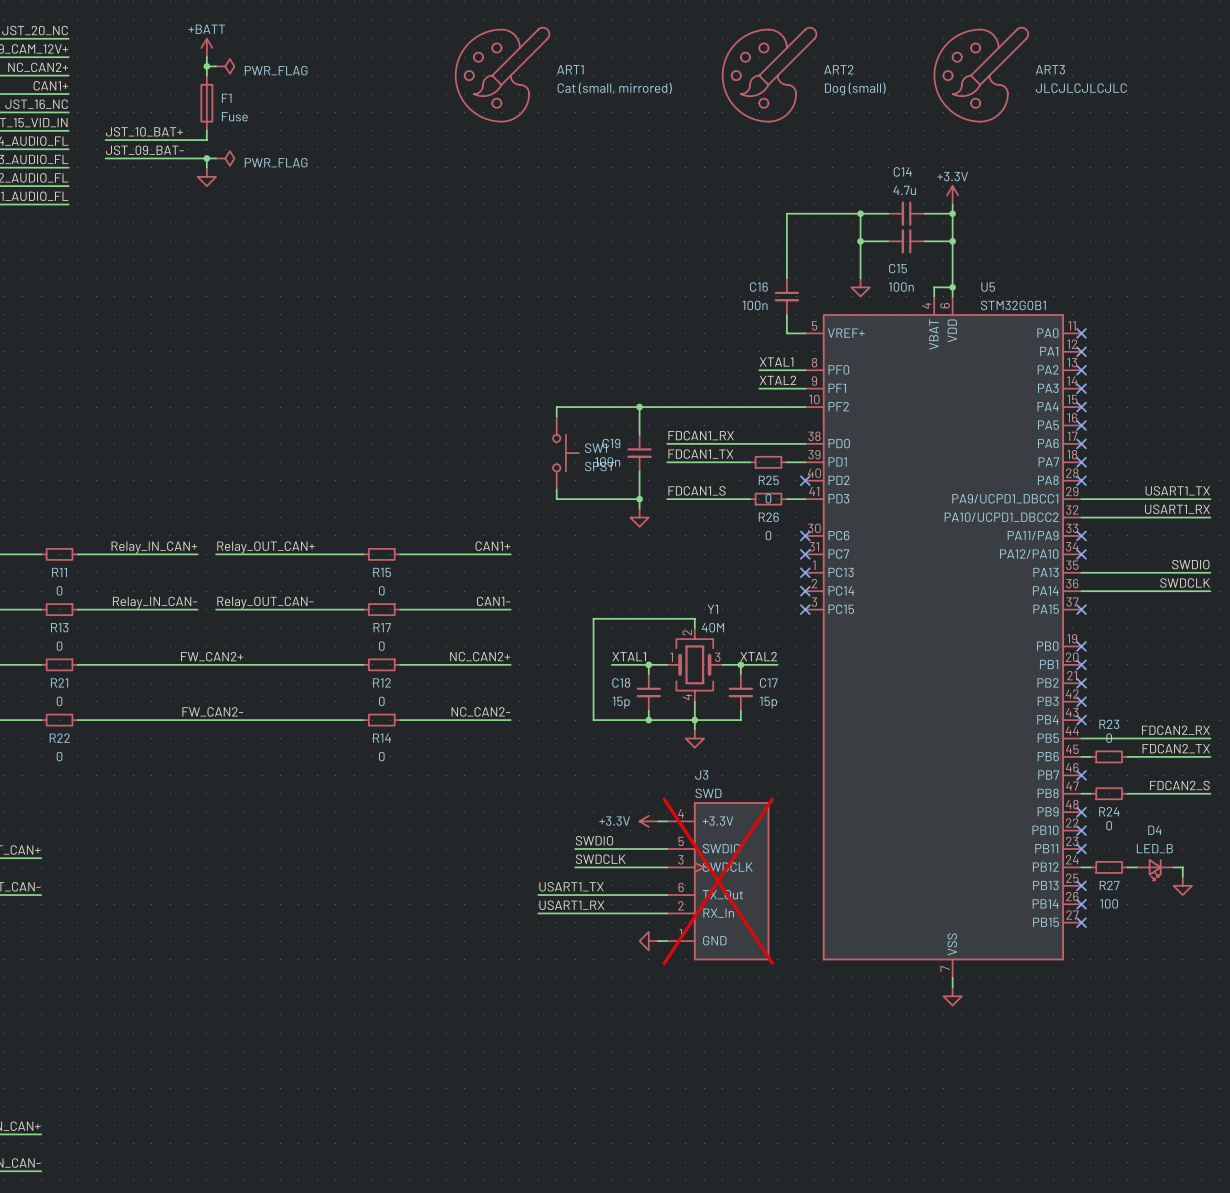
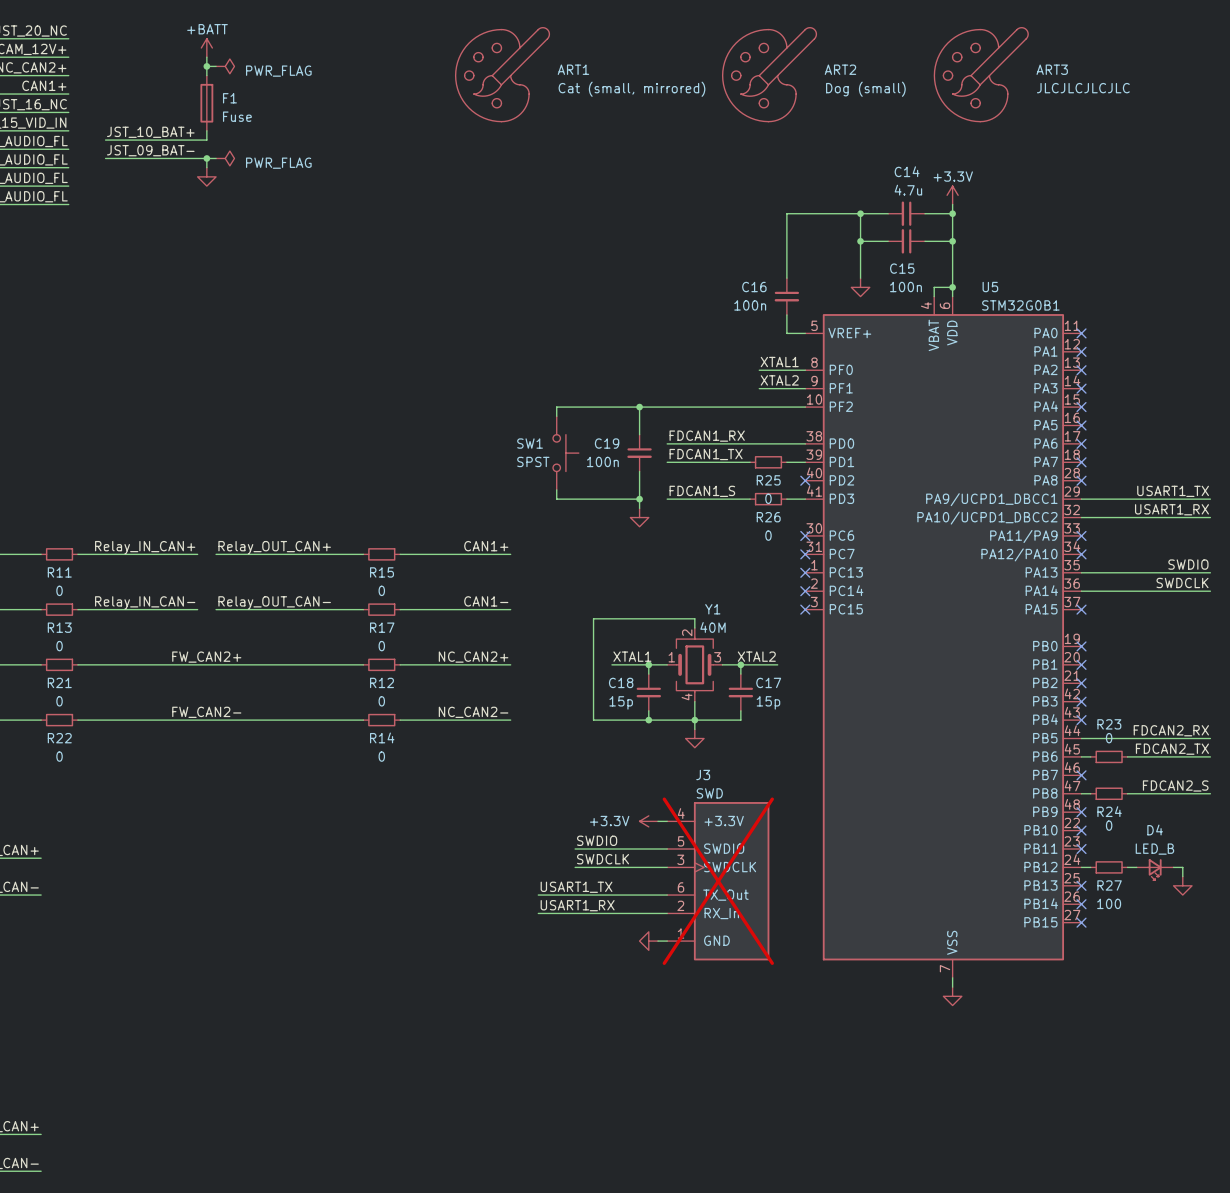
SW1 name position: SW1 (595, 448) -> SW1 (530, 443)
SW1 value position: SPST (599, 466) -> SPST (533, 461)

